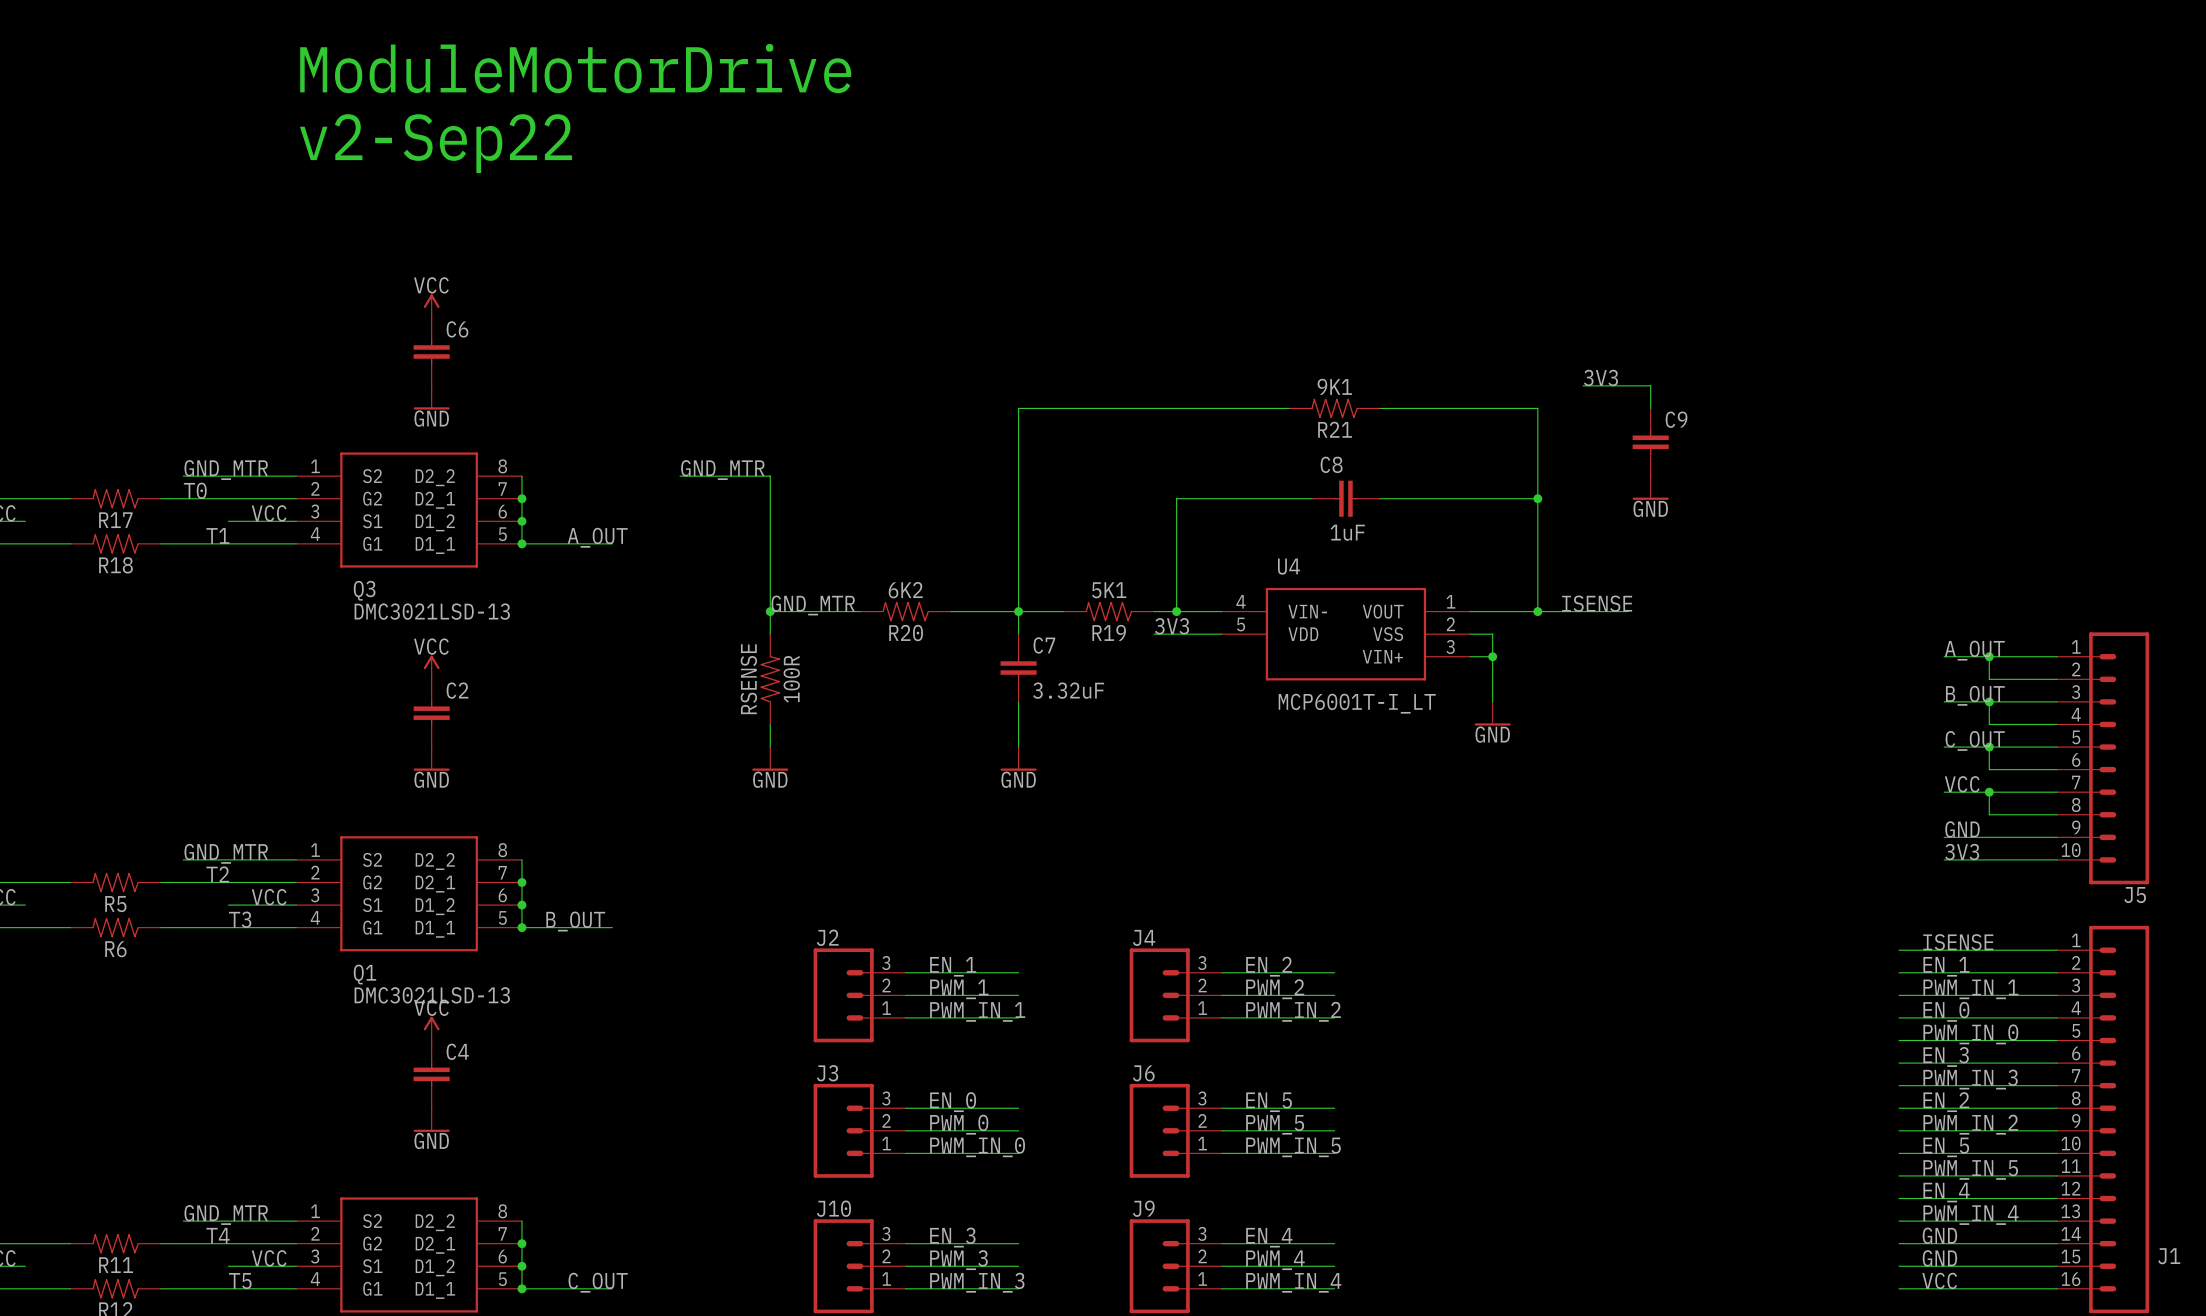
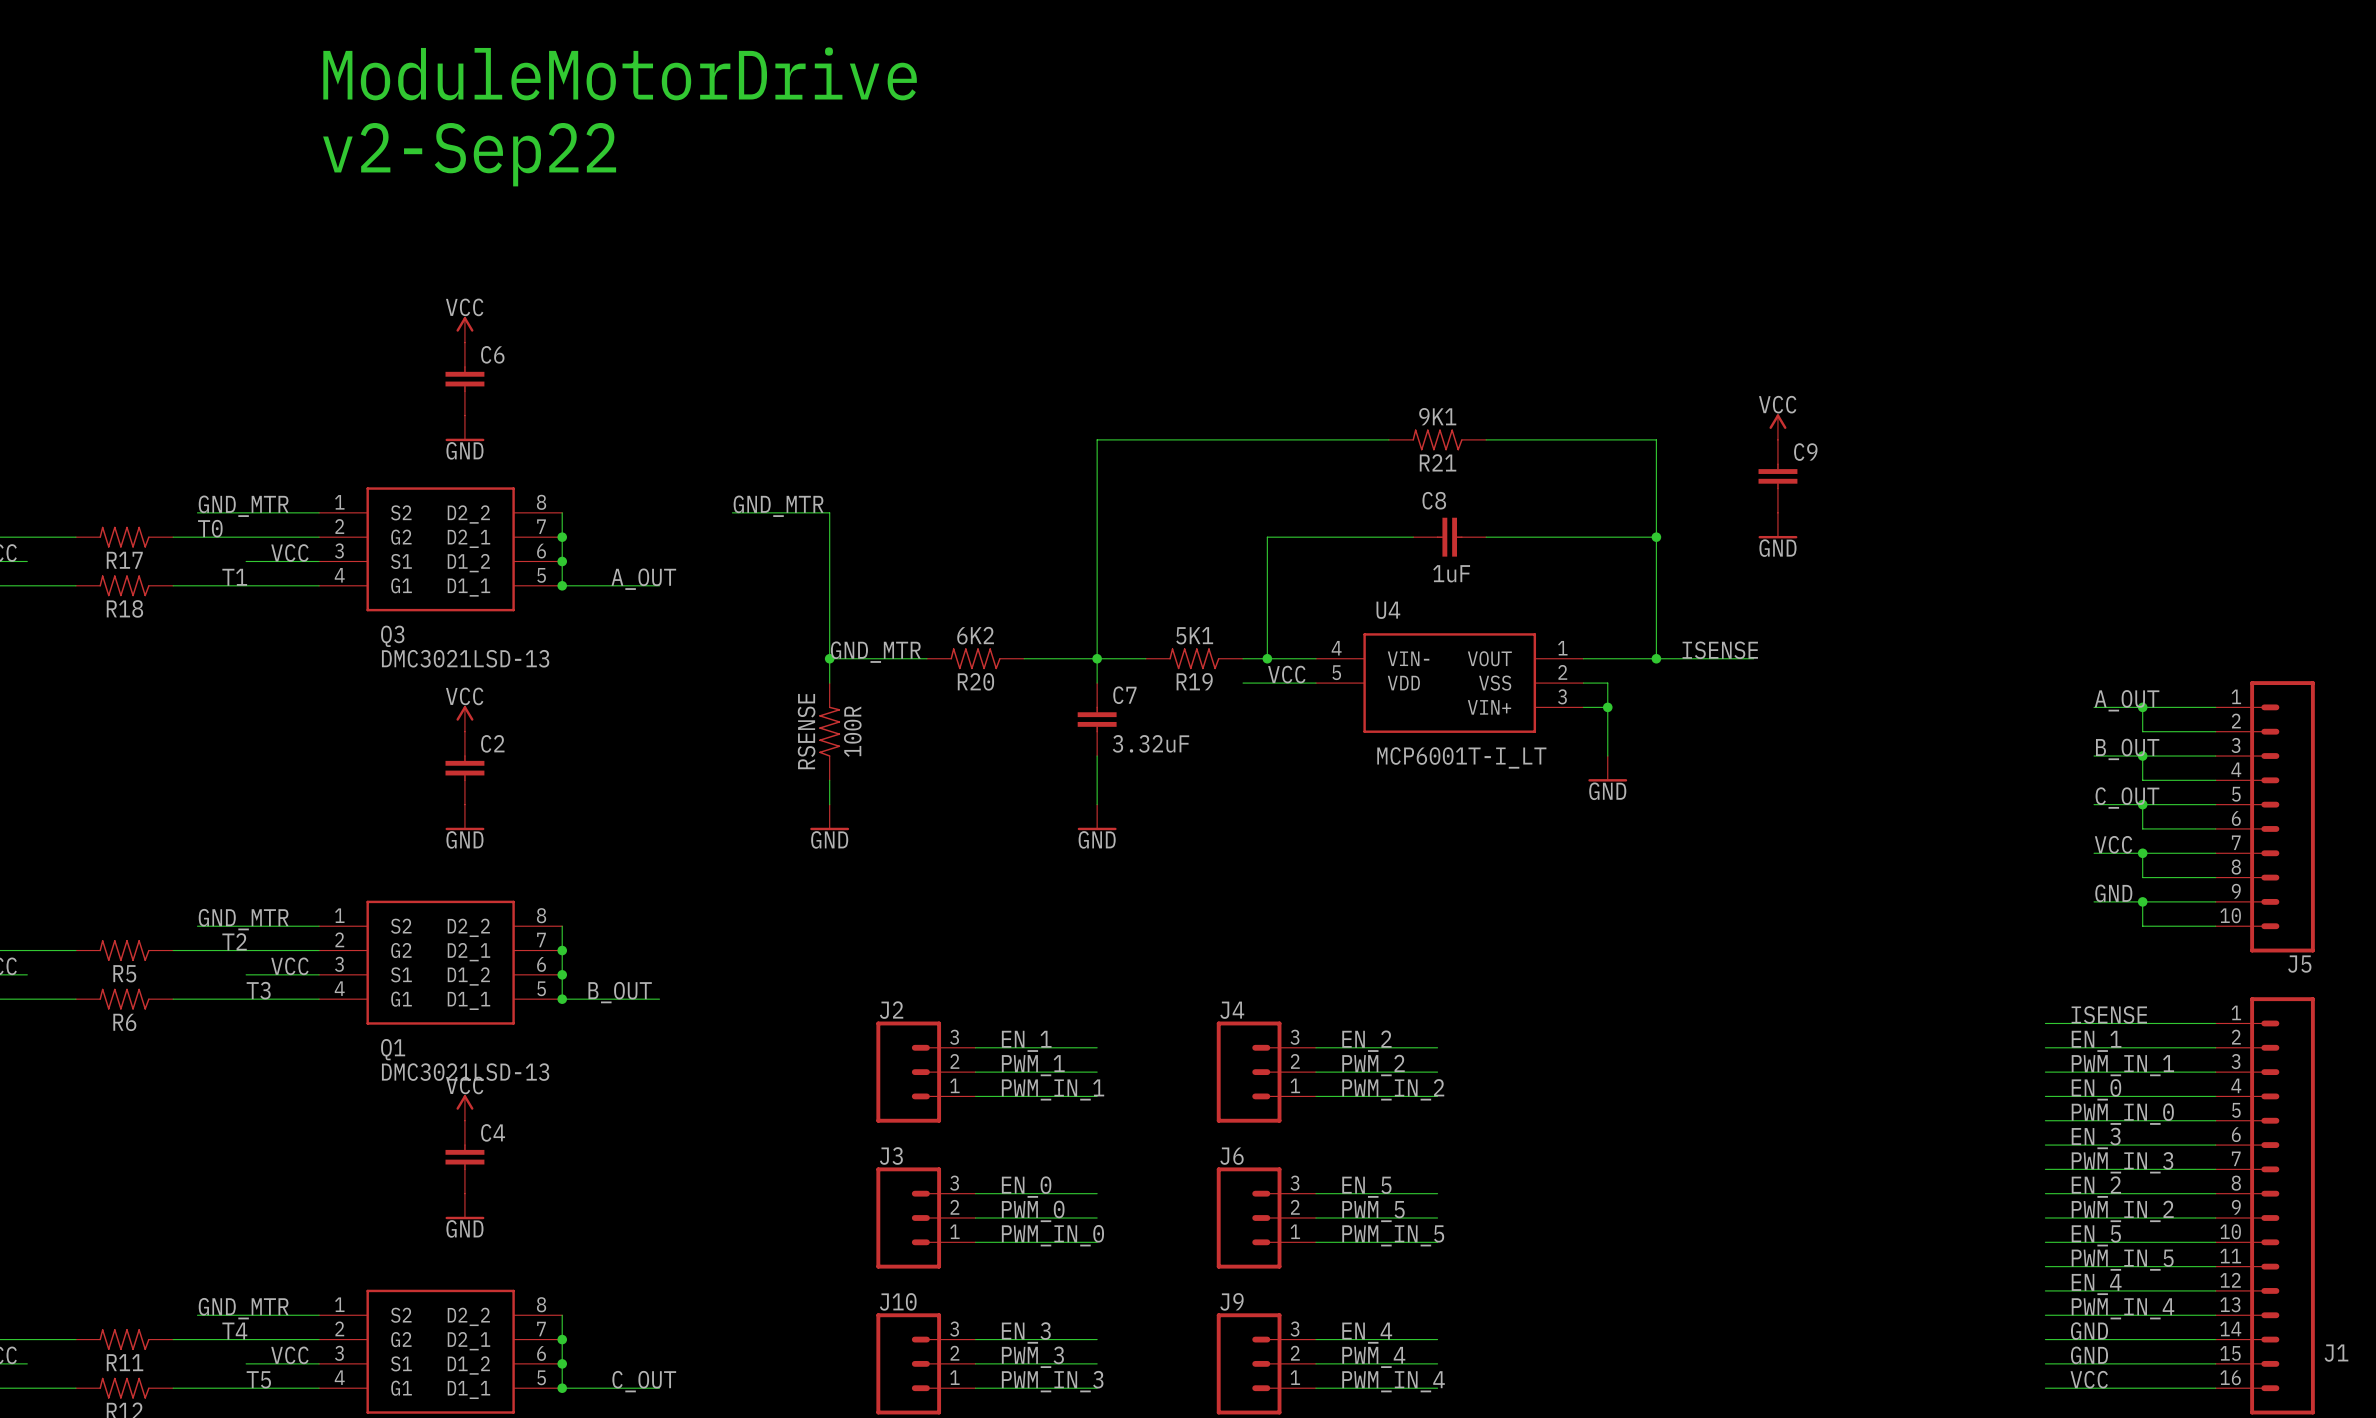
label: 3V3 (1600, 377) -> none
wire: (1582, 385) (1650, 385) (1650, 408) -> none
power symbol: none -> VCC (1777, 427)
label: 3V3 (1172, 626) -> none
label: none -> VCC (1286, 674)
junction: none -> (2142, 901)
label: 3V3 (1962, 852) -> none
wire: (1944, 859) (1989, 859) -> (2142, 901) (2142, 926)

